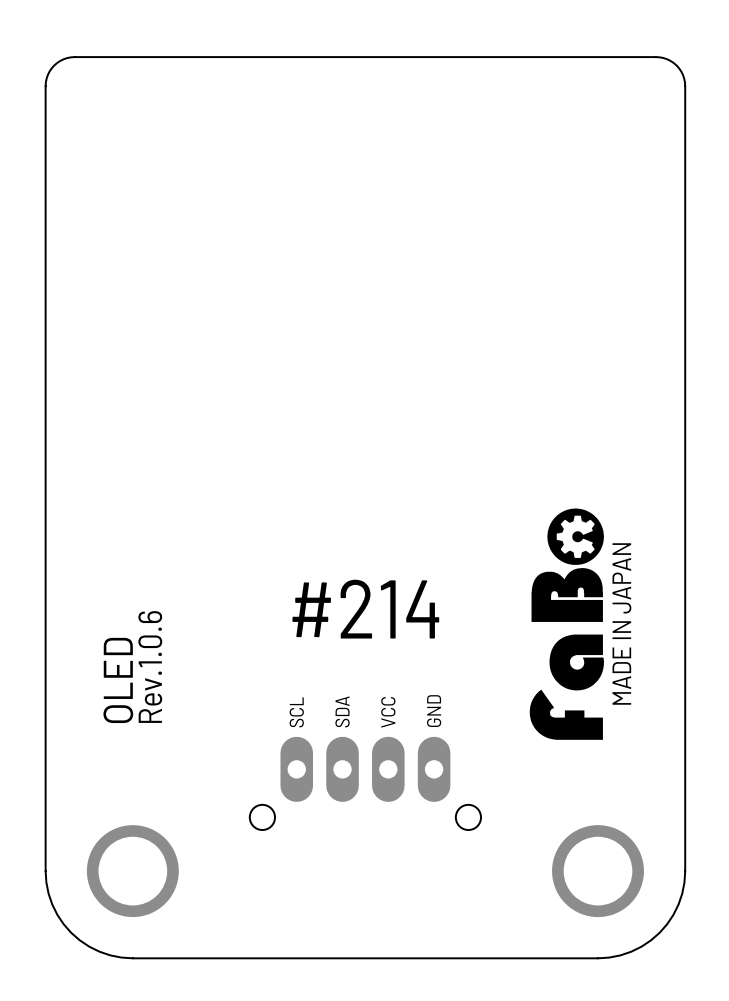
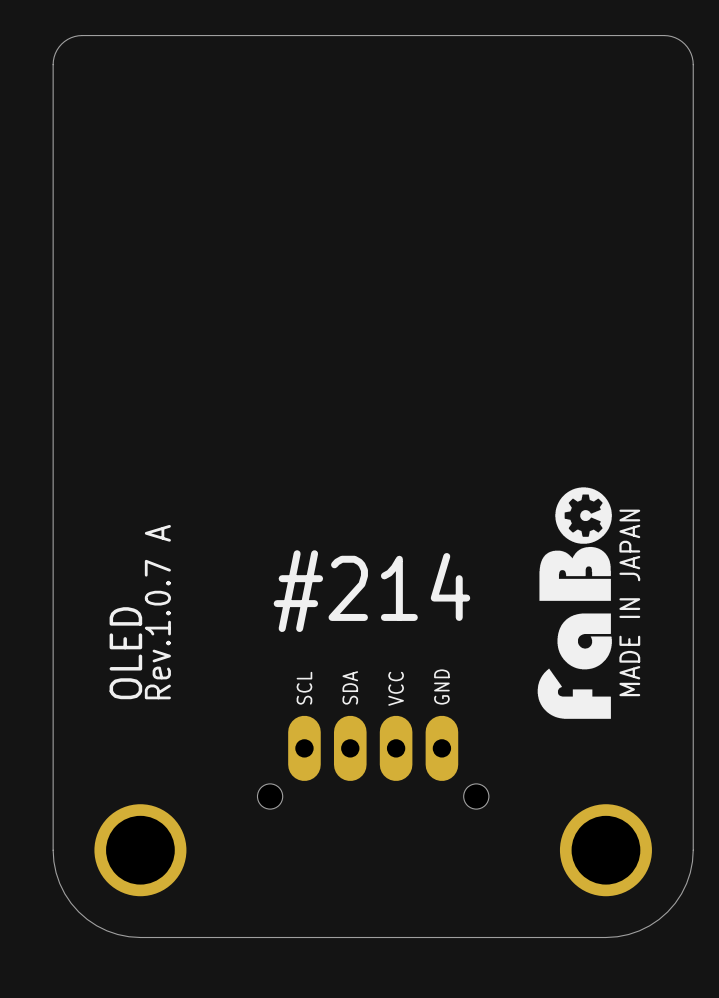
text: Rev.1.0.6 (150, 667) -> Rev.1.0.7 A (157, 612)

